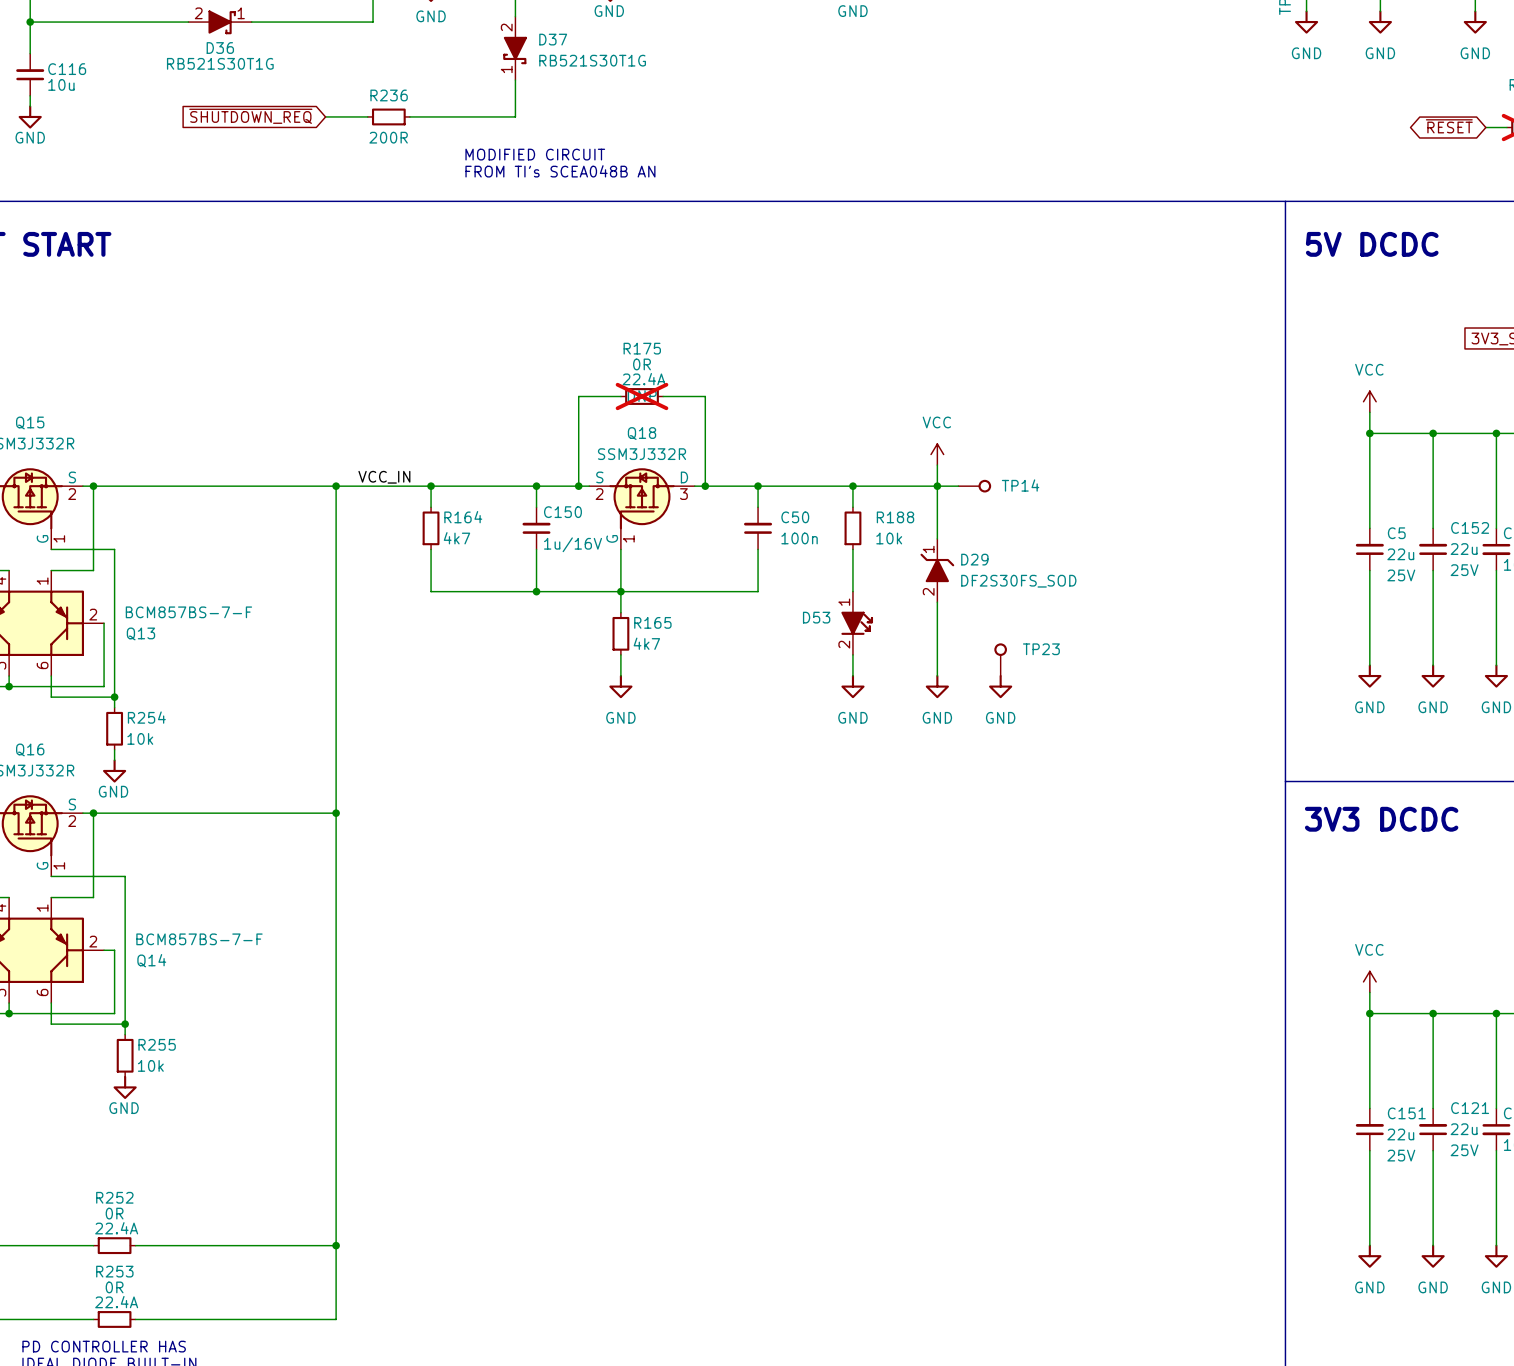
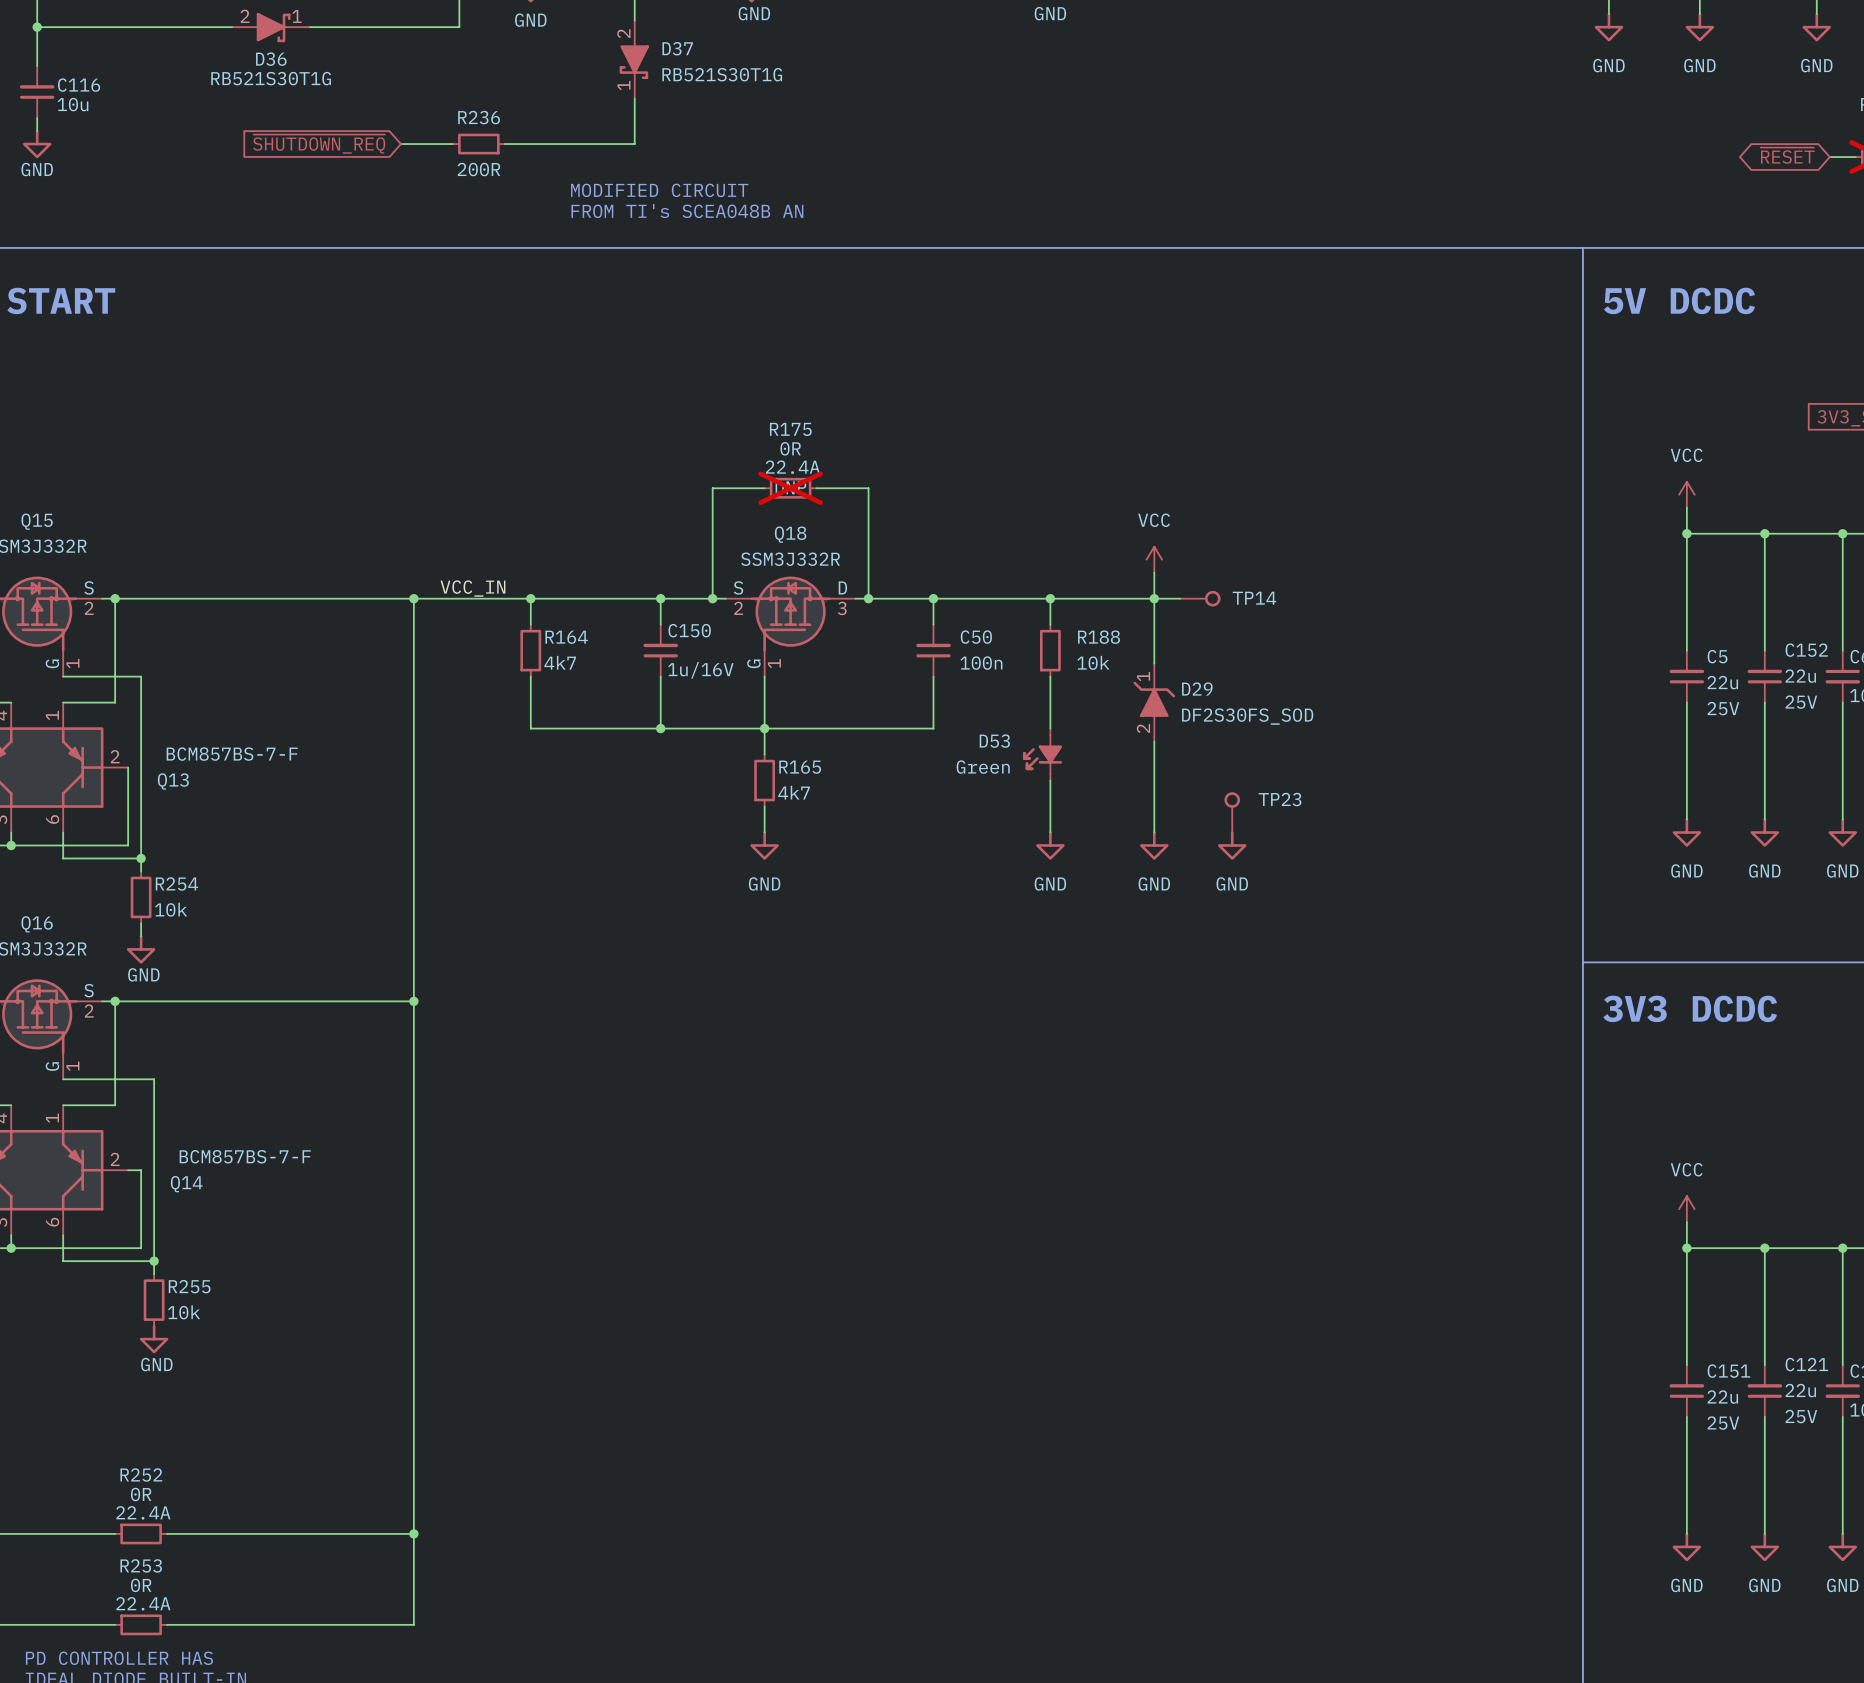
D53 symbol: [841, 591, 874, 655] -> [1023, 728, 1063, 781]
D53 text: none -> Green (983, 767)

